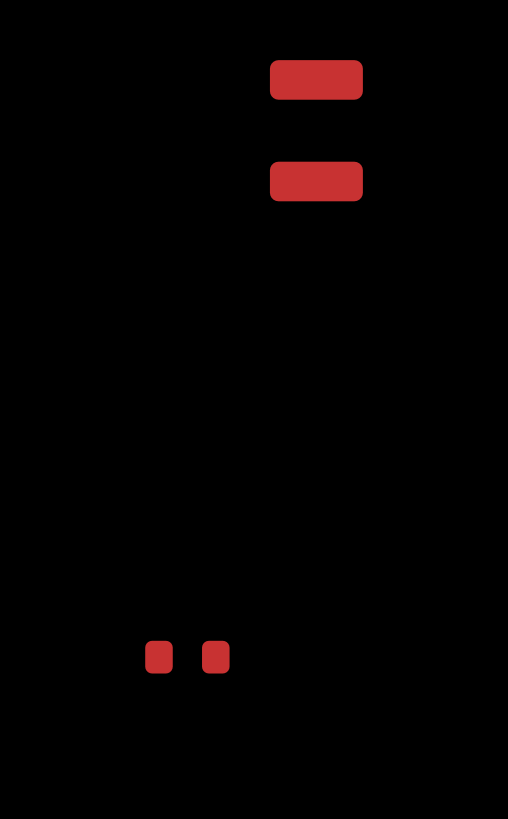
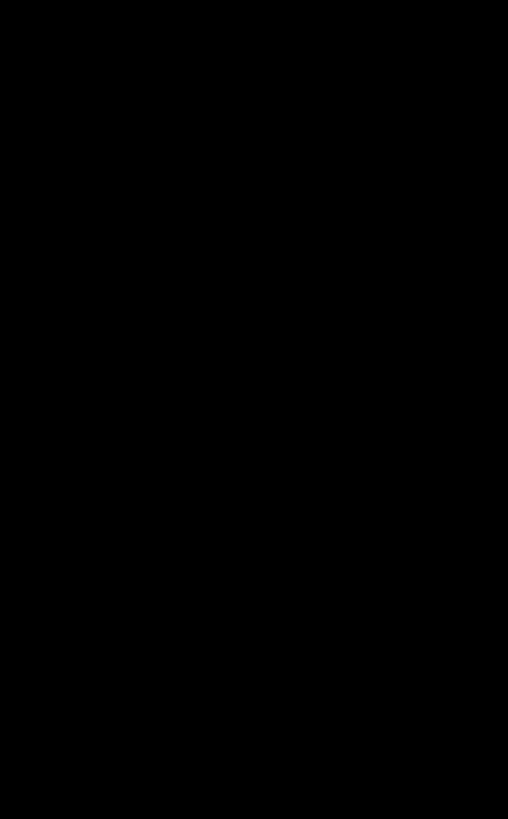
part: (316, 130) -> none
part: (187, 657) -> none

